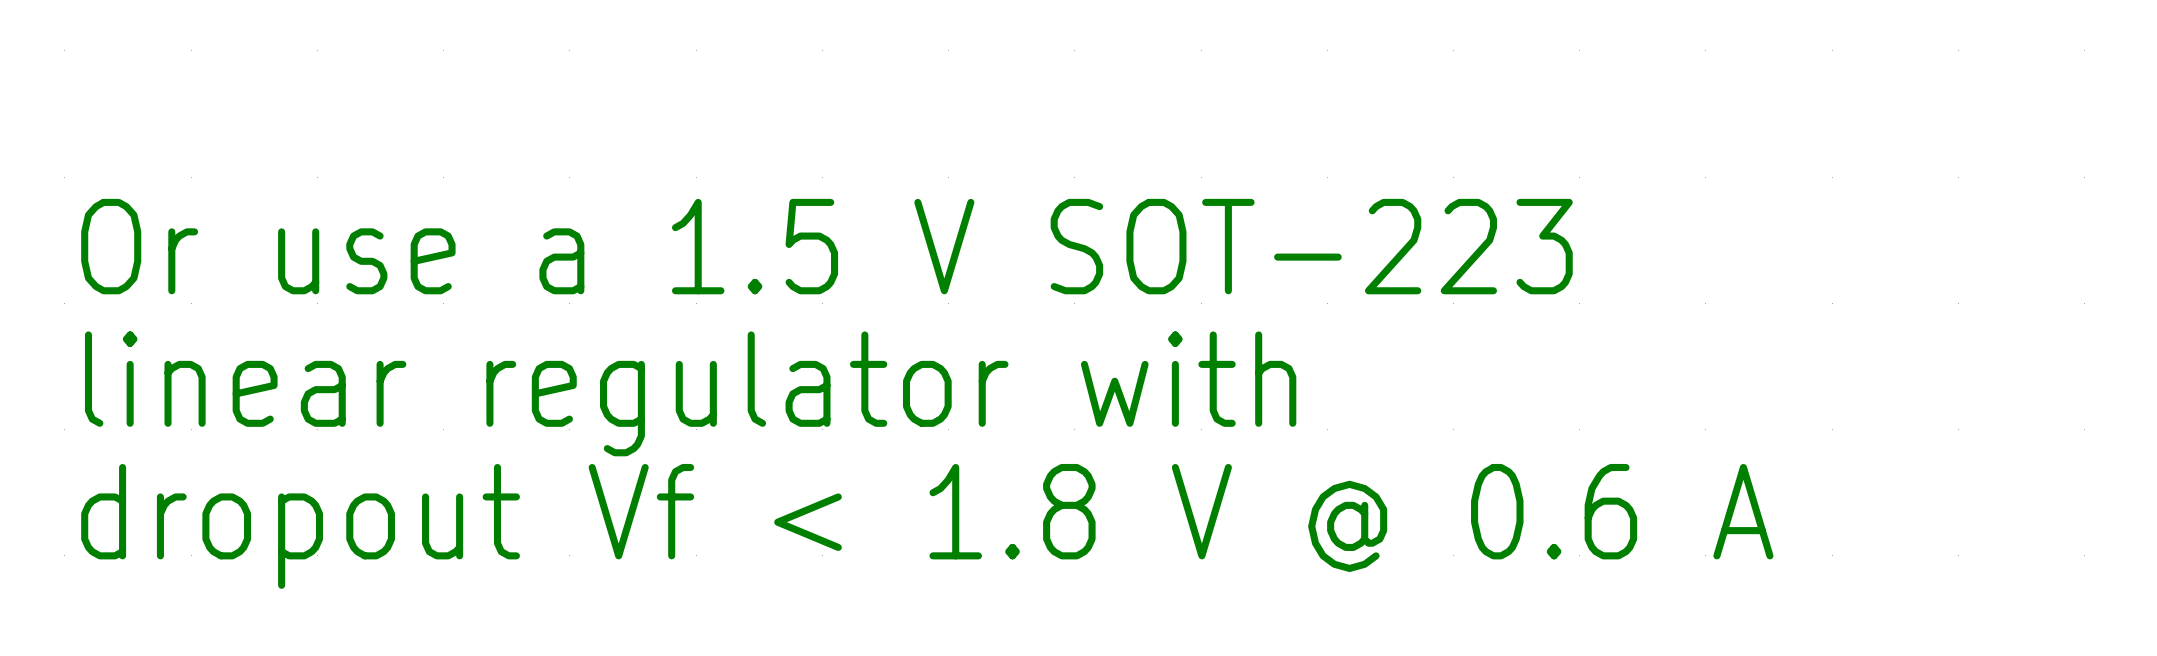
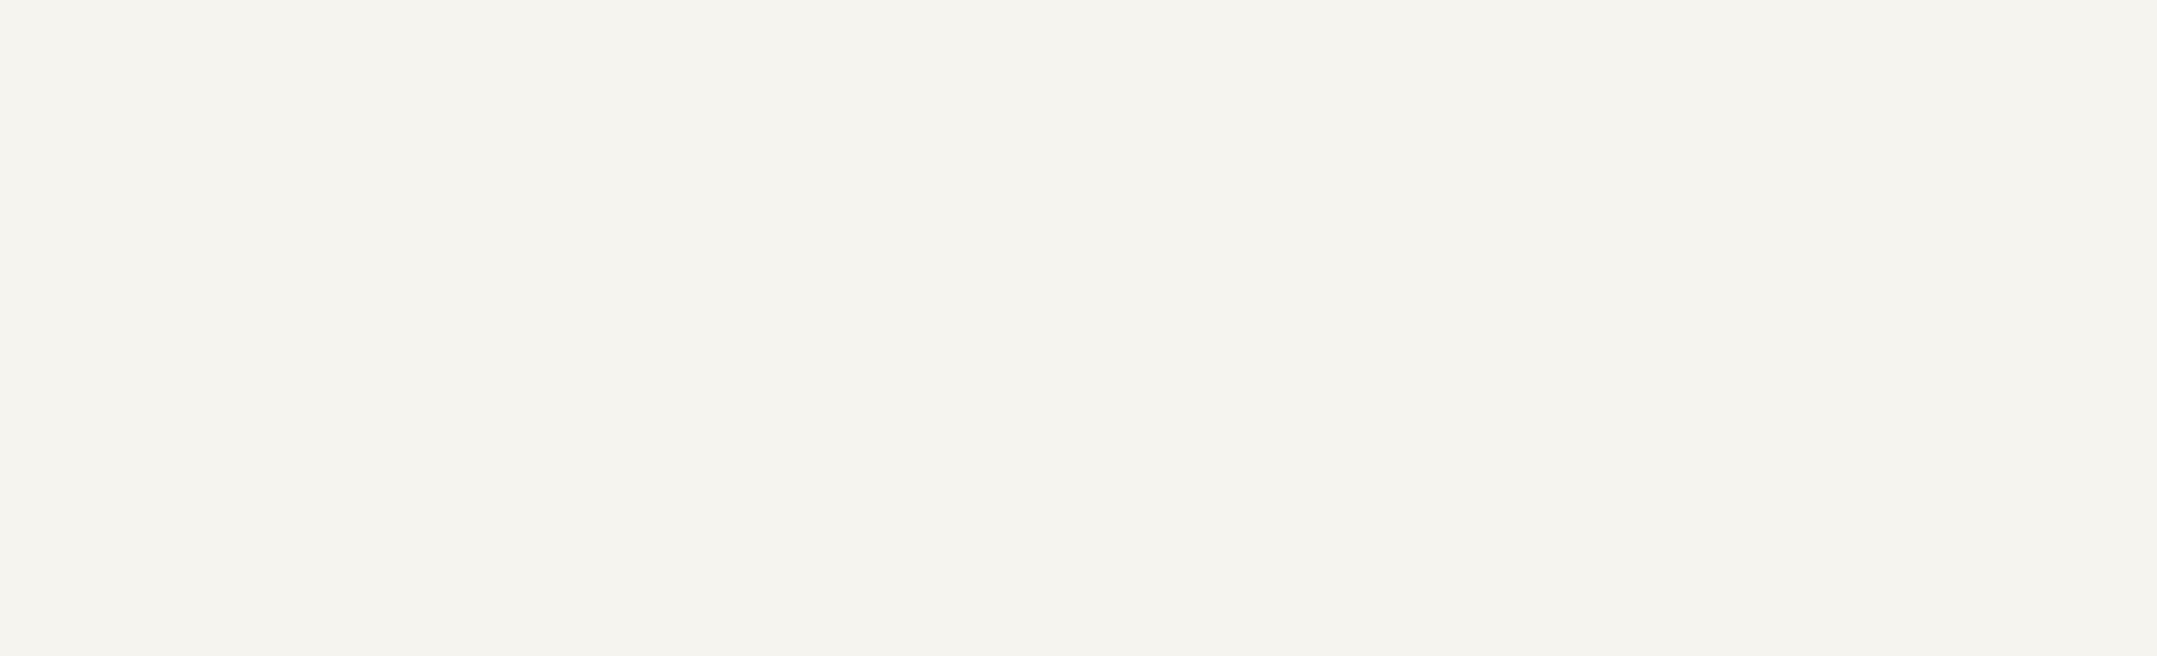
text: Or use a 1.5 V SOT-223 (826, 246) -> none
text: linear regulator with (690, 393) -> none
text: dropout Vf < 1.8 V @ 0.6 A (927, 526) -> none

